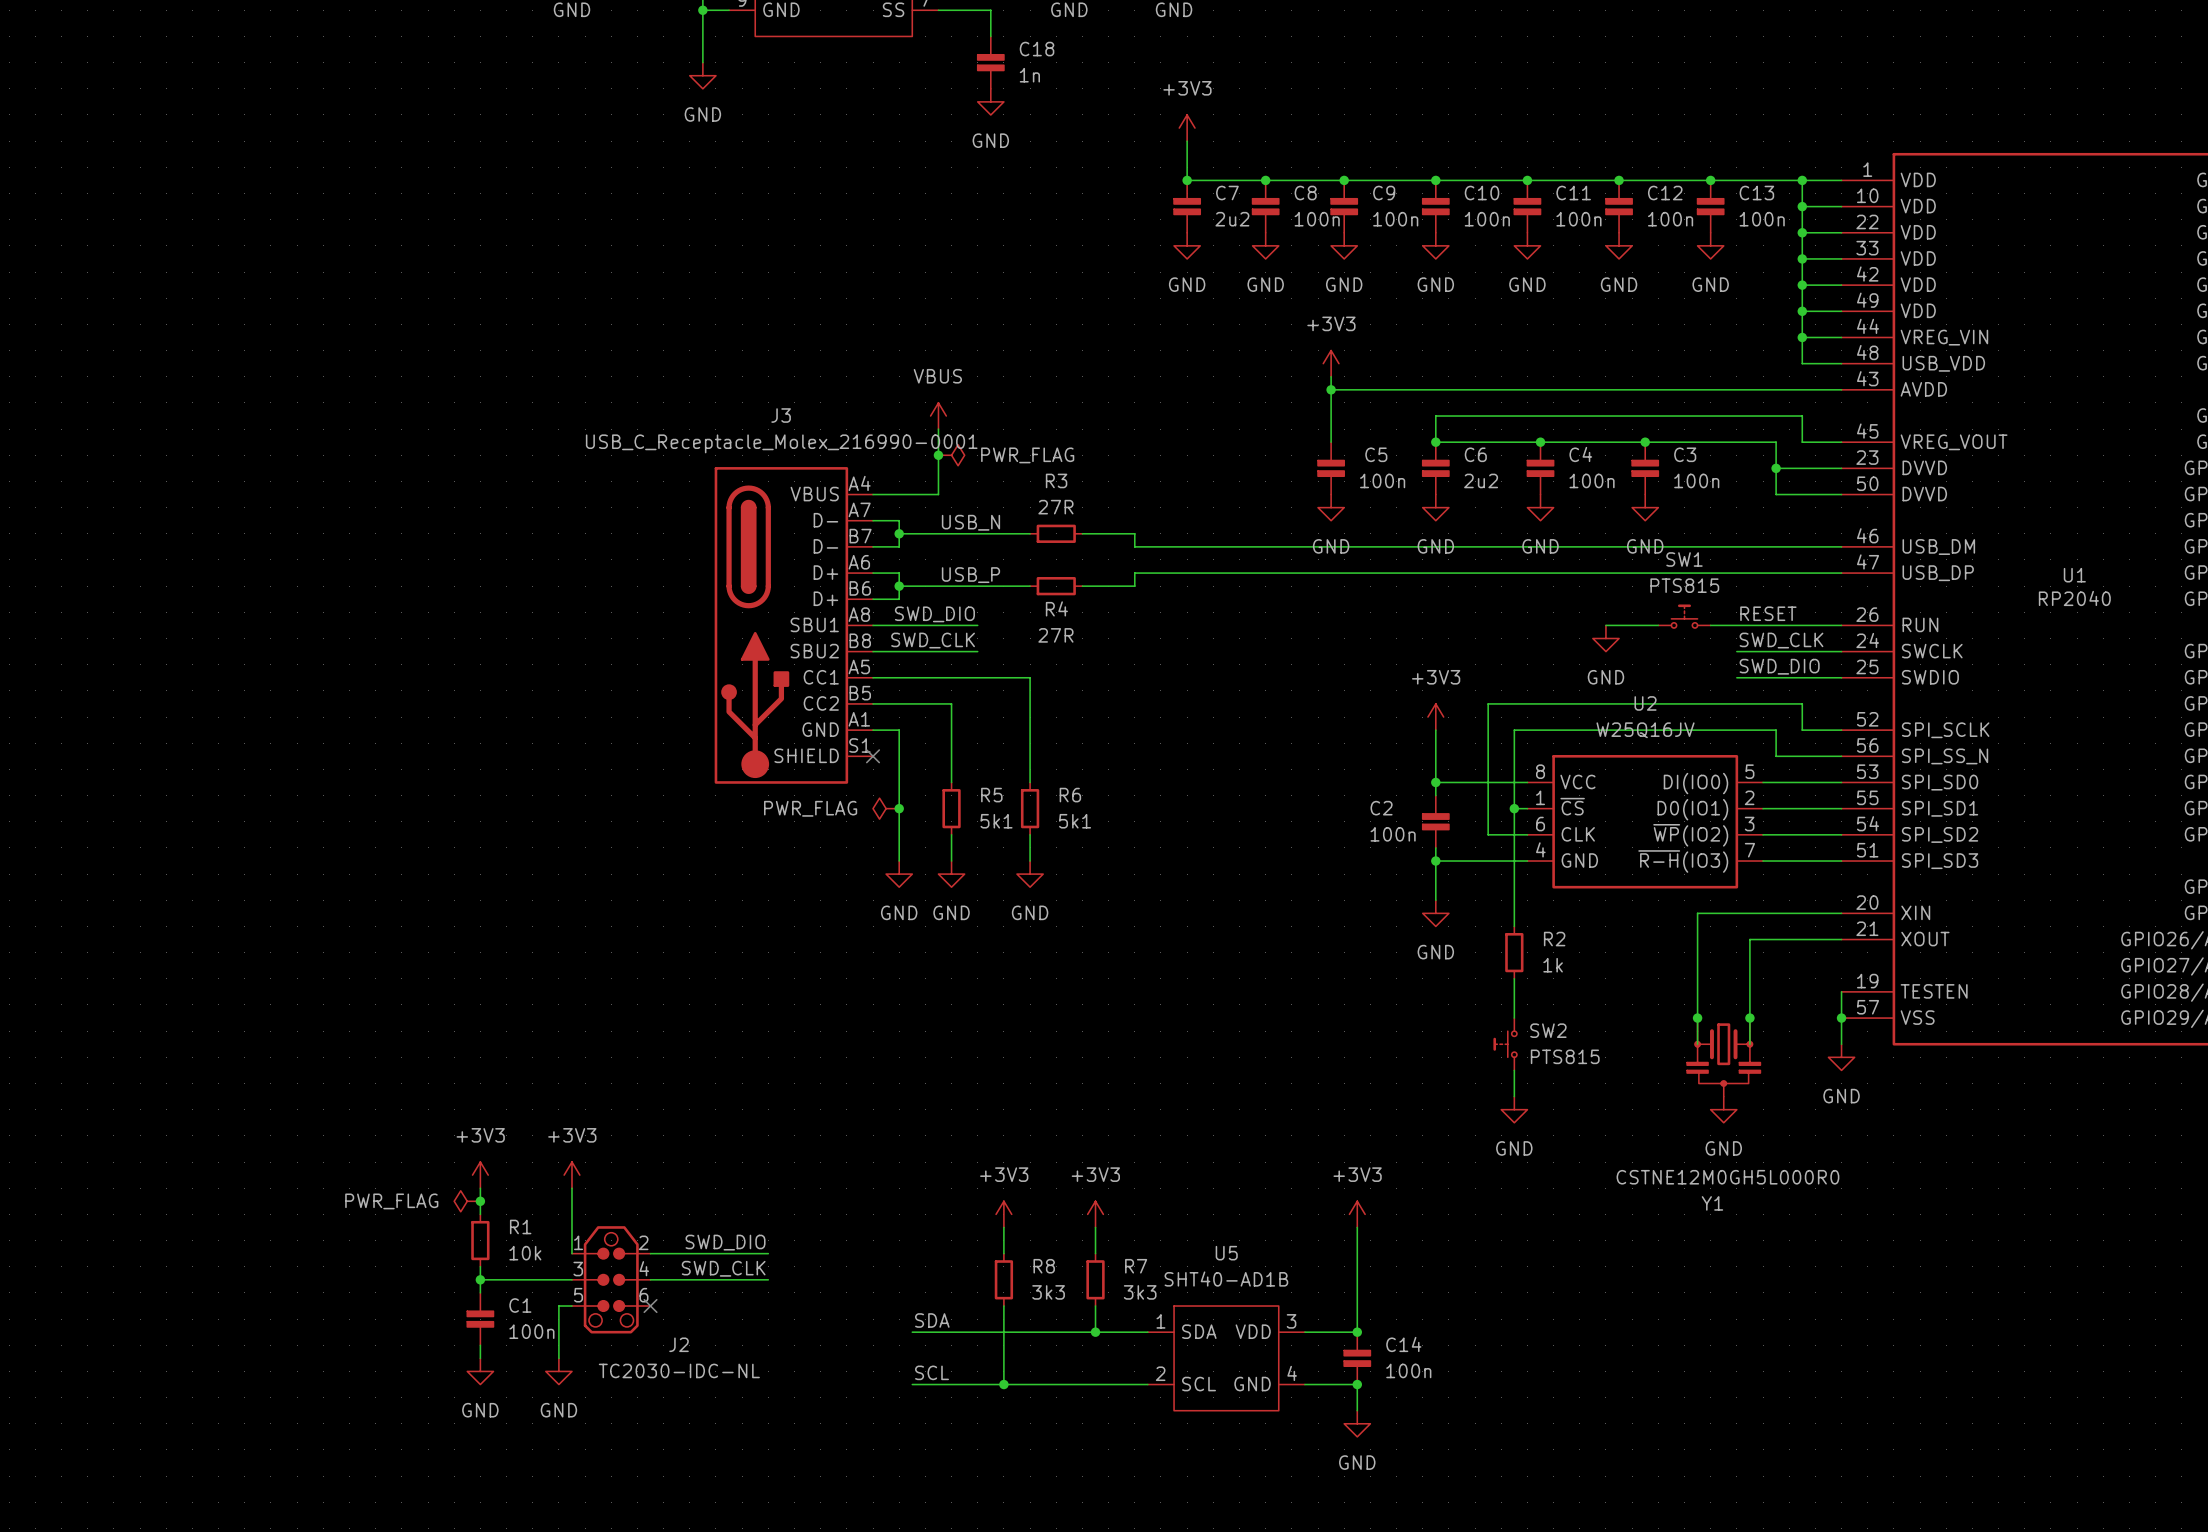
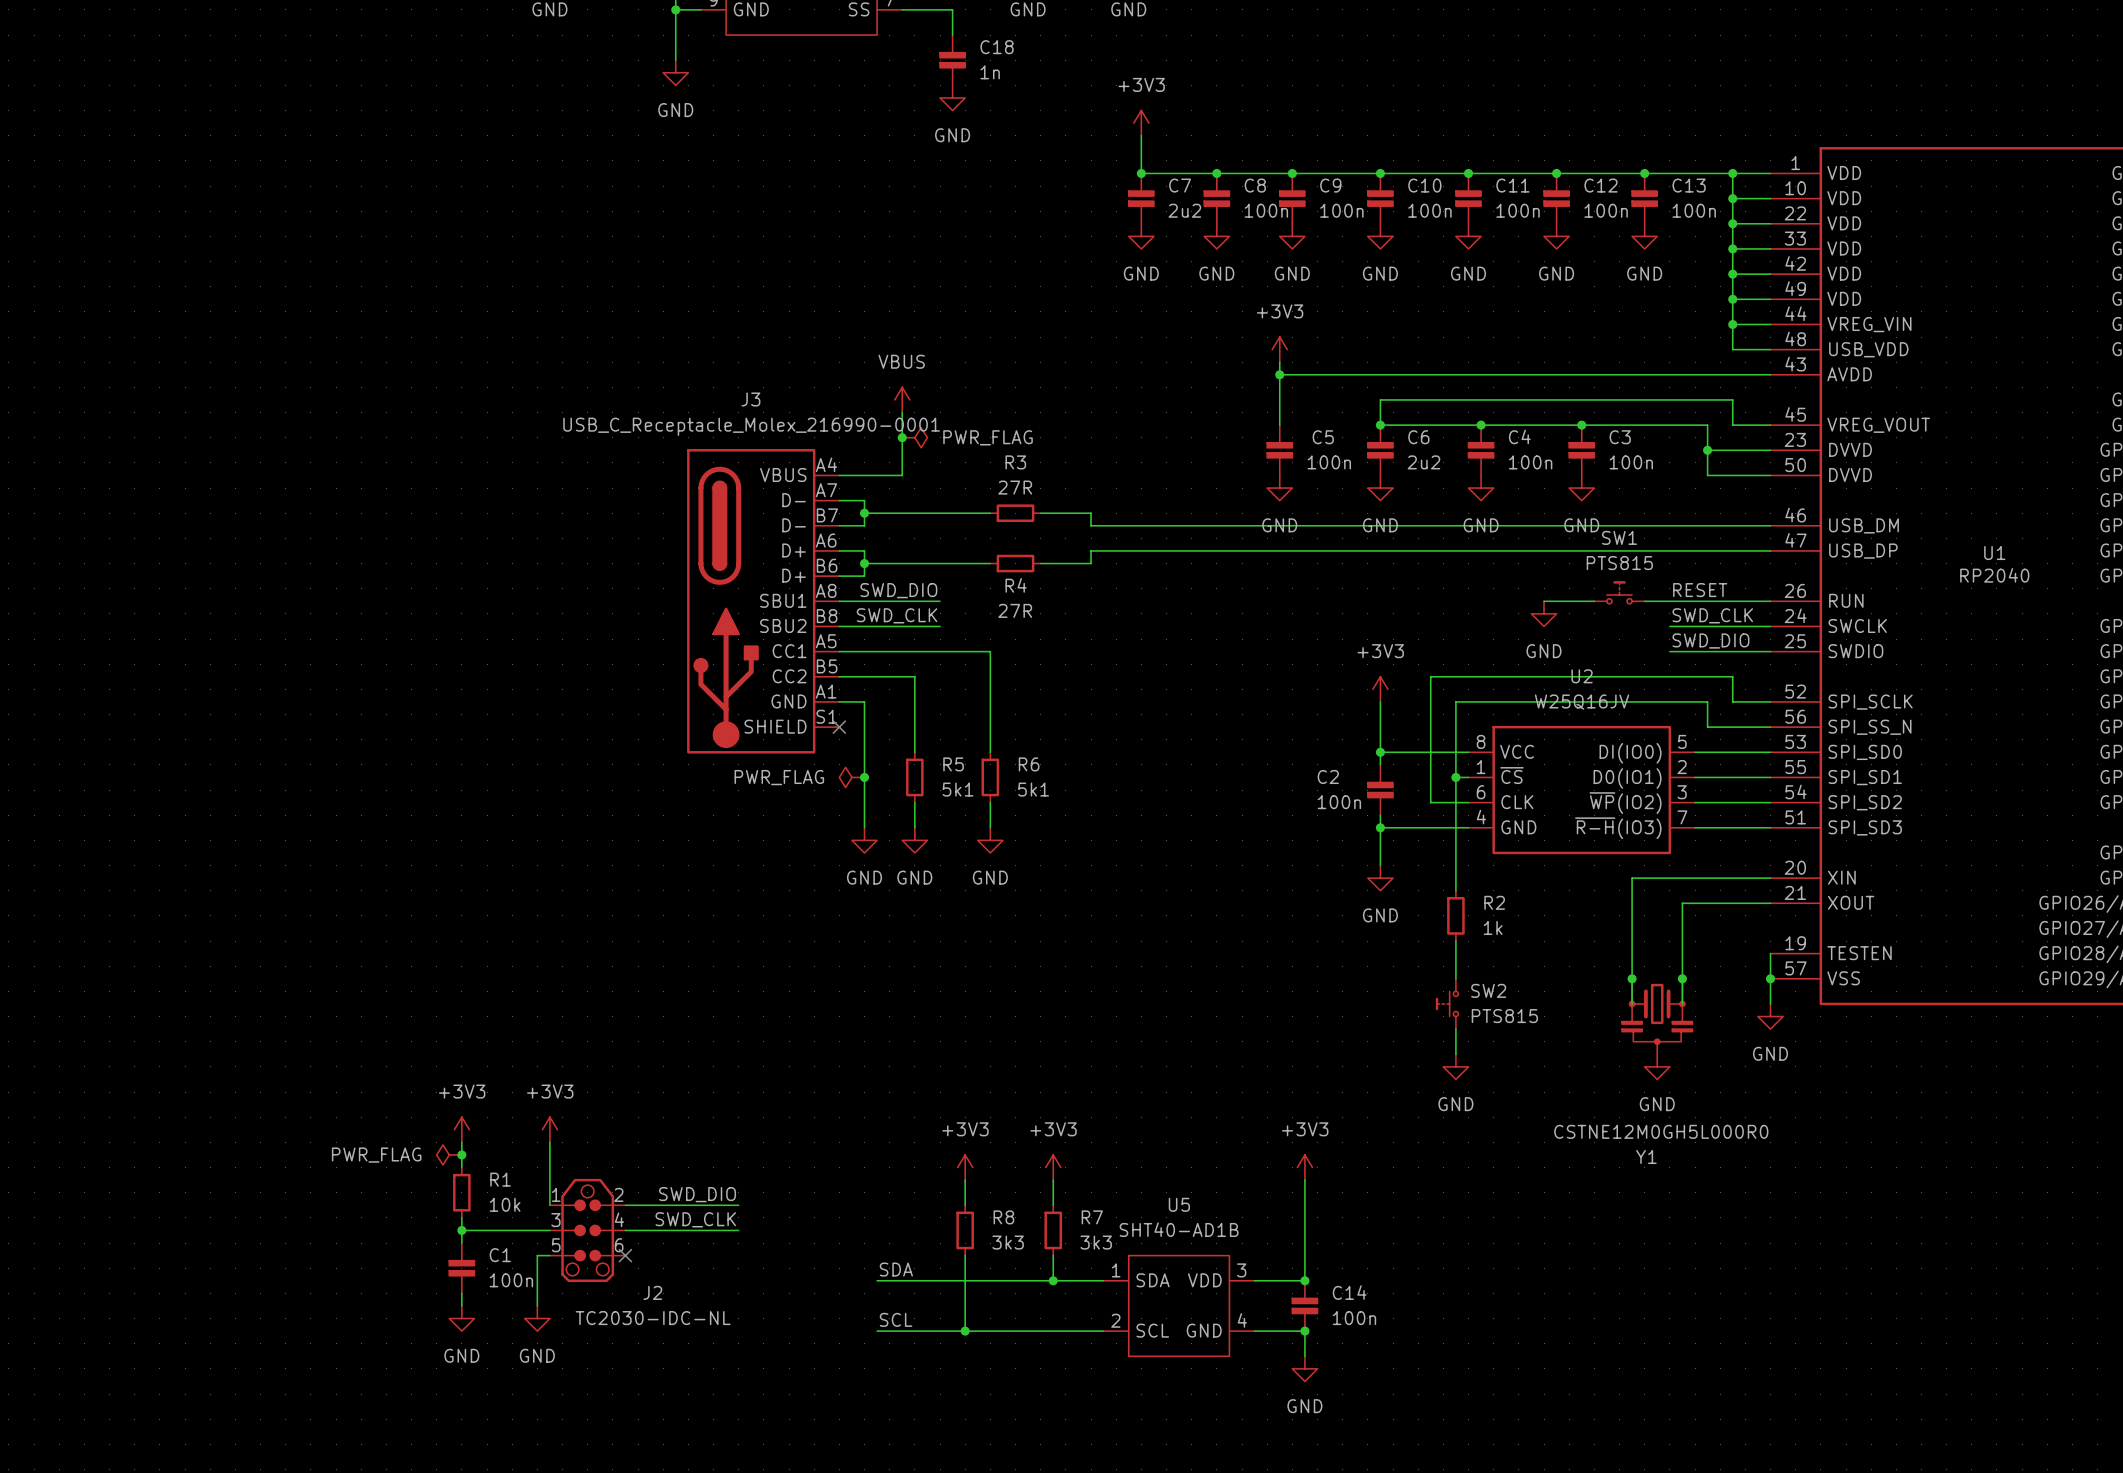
label: USB_N (970, 522) -> none
label: USB_P (970, 575) -> none

